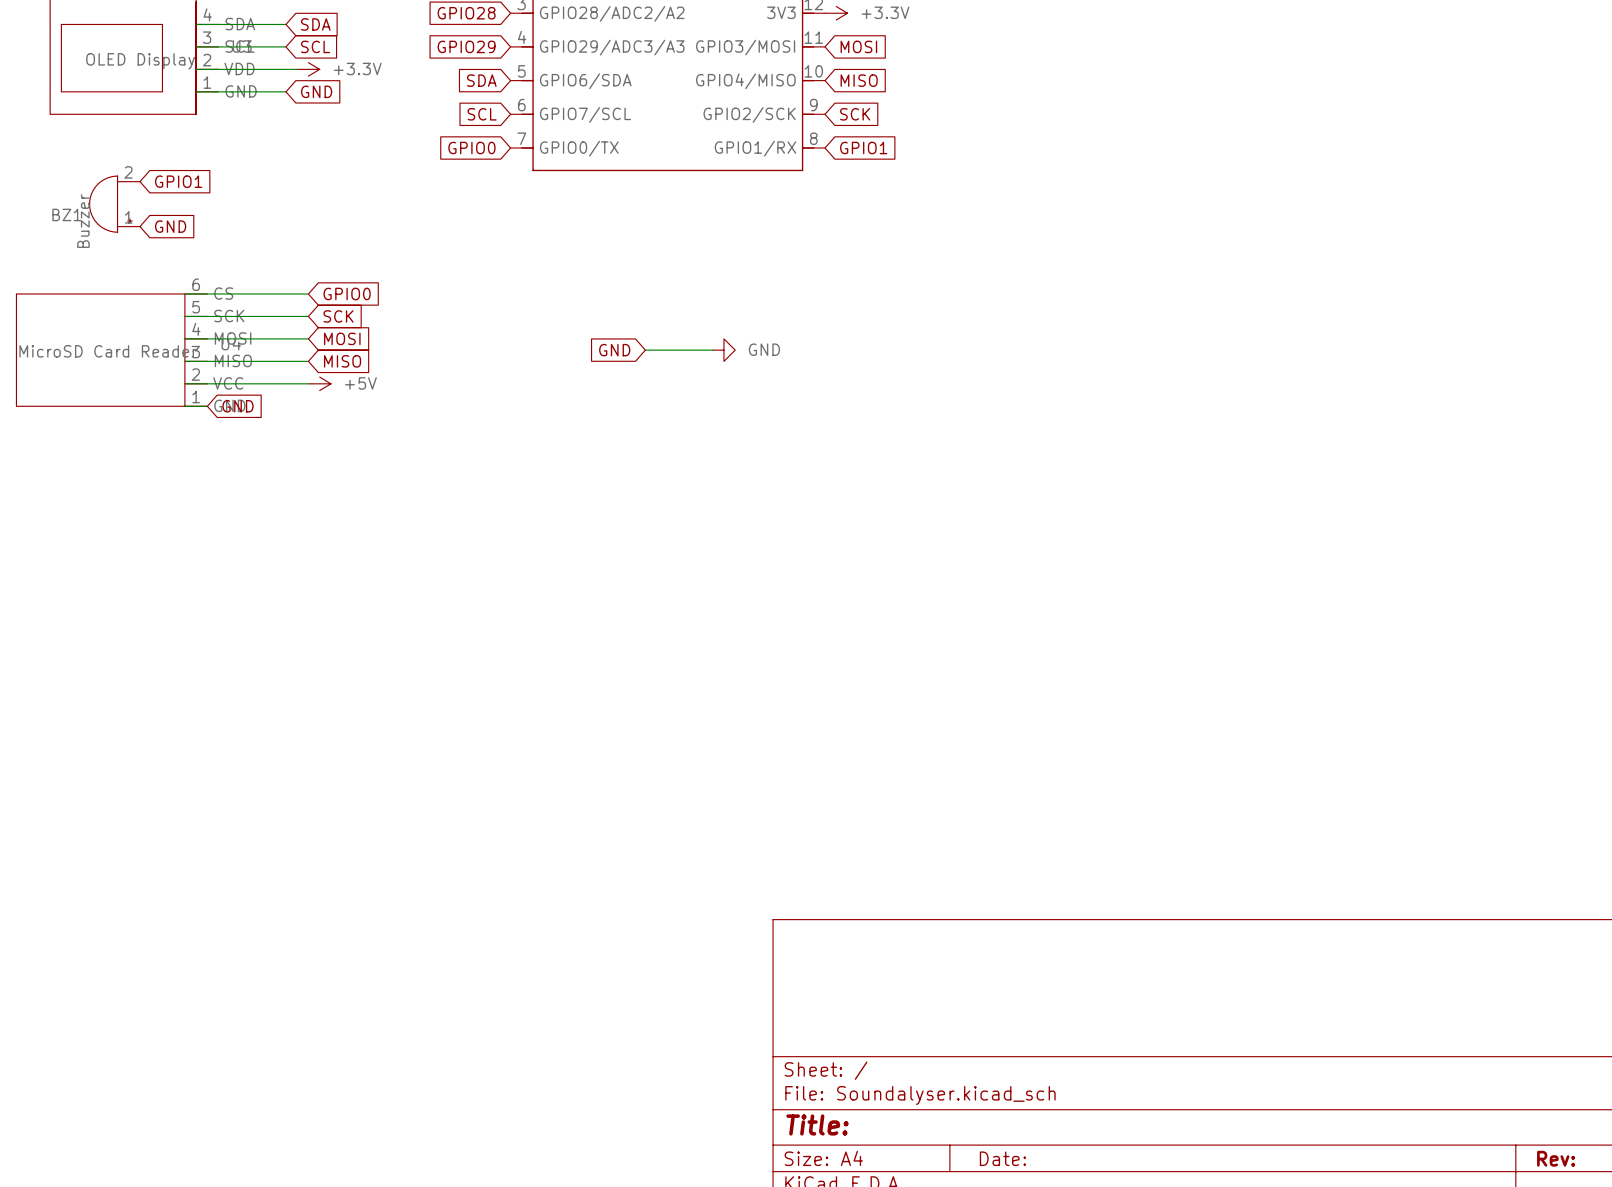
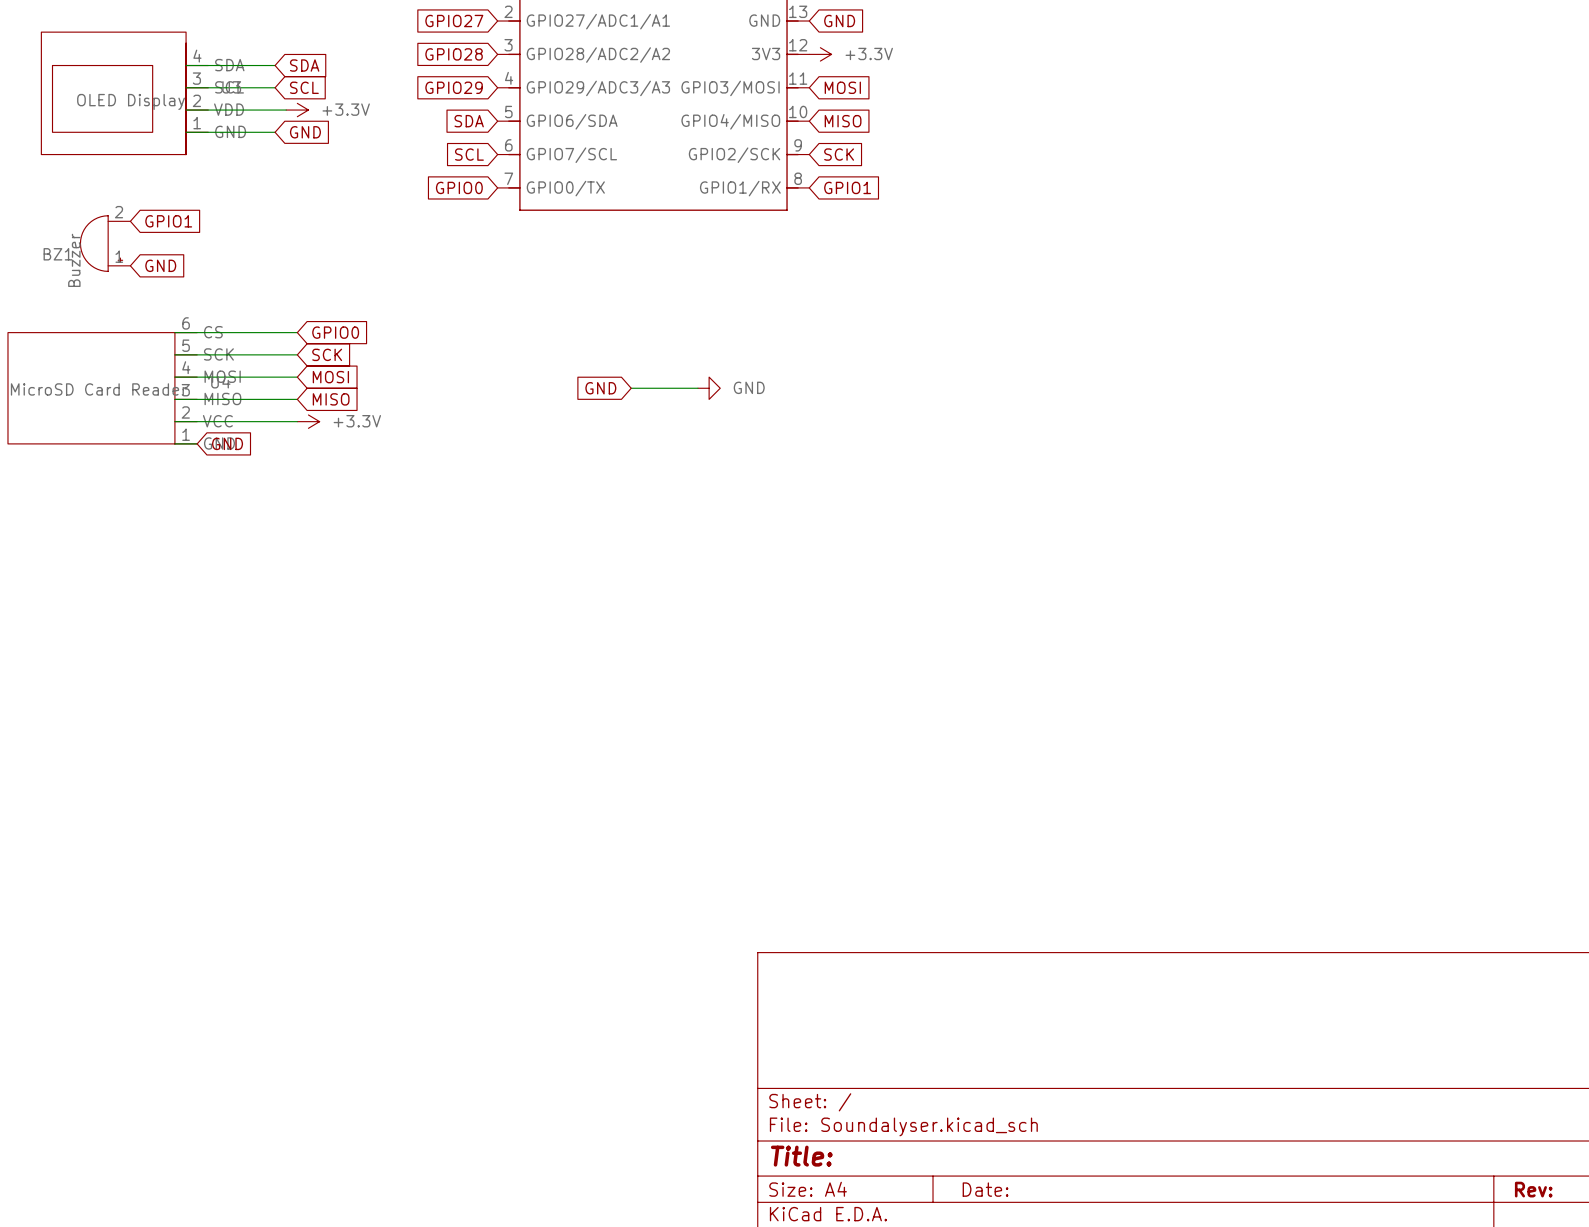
power symbol: +5V (319, 383) -> +3.3V (308, 421)

